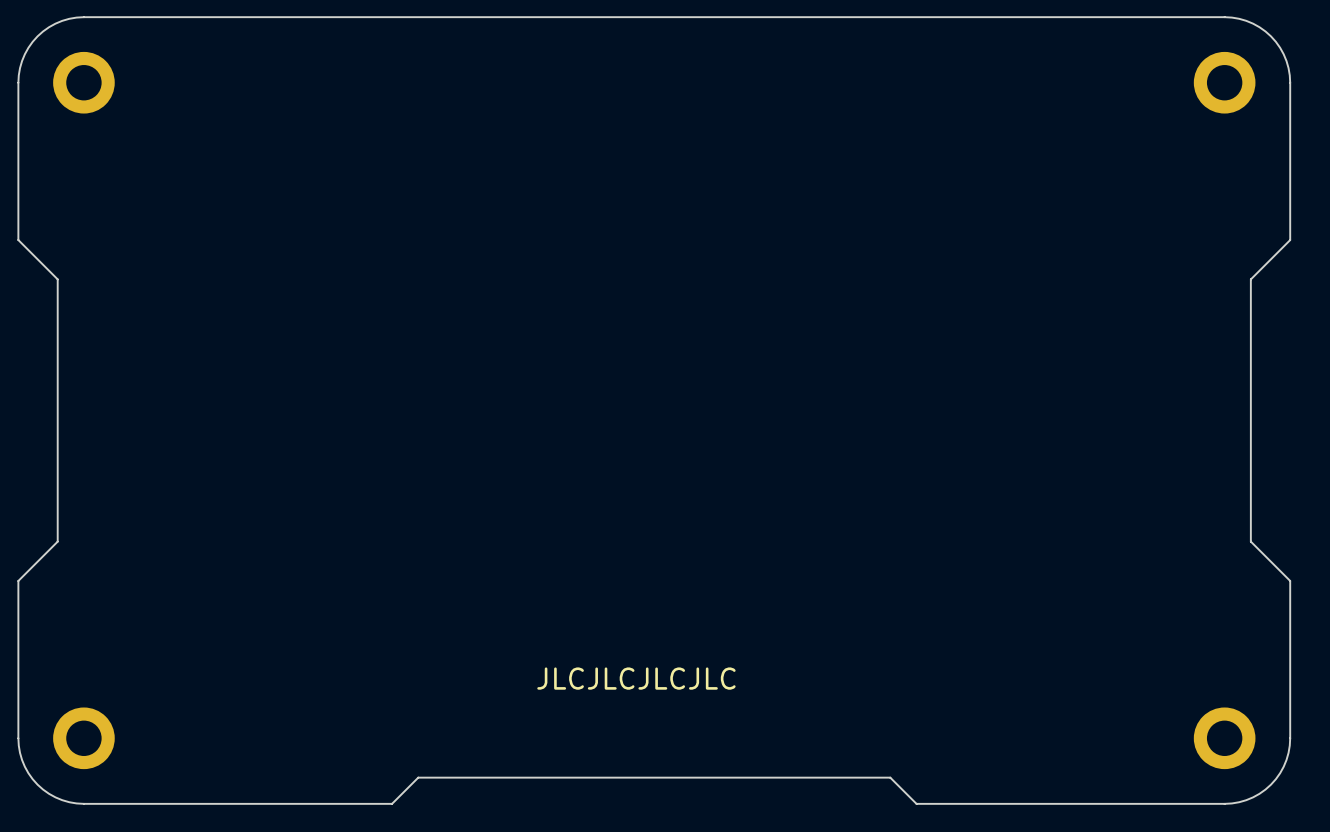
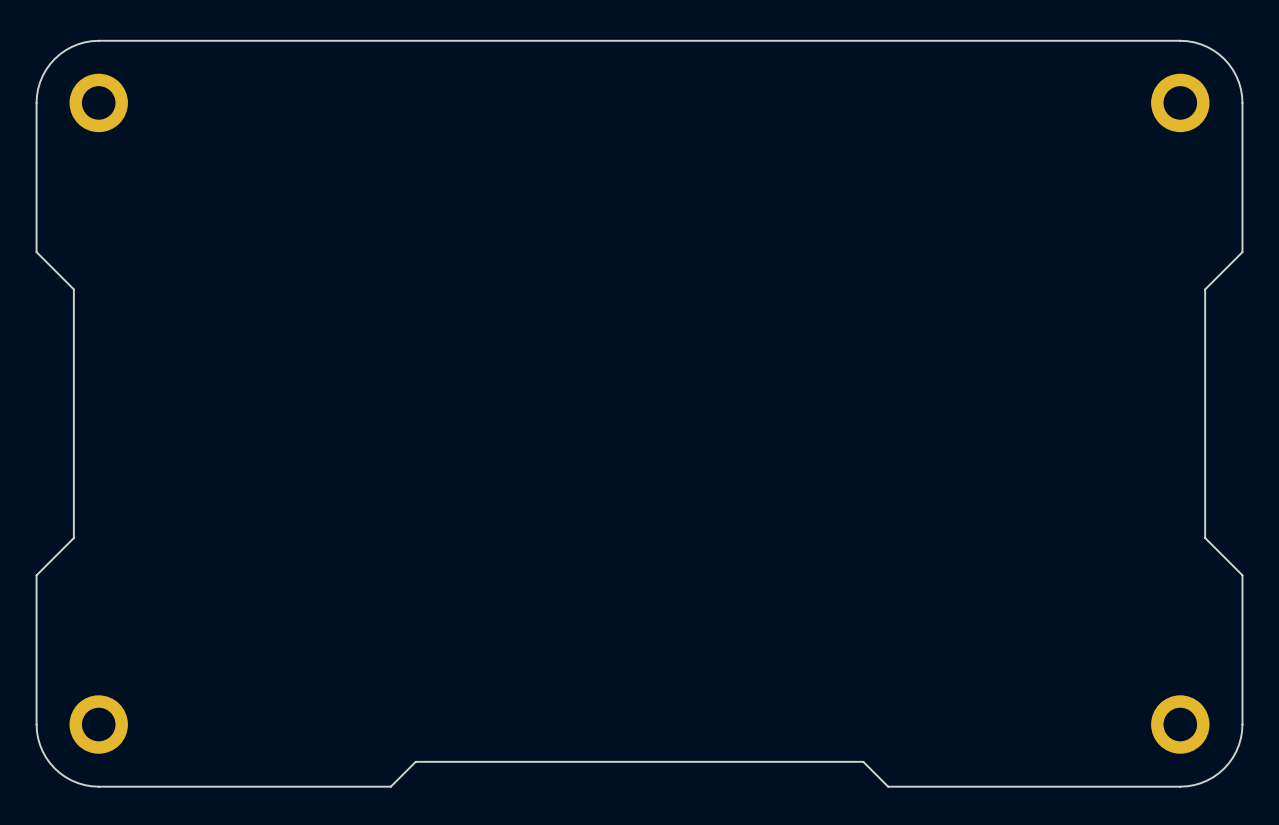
text: JLCJLCJLCJLC (636, 678) -> none

